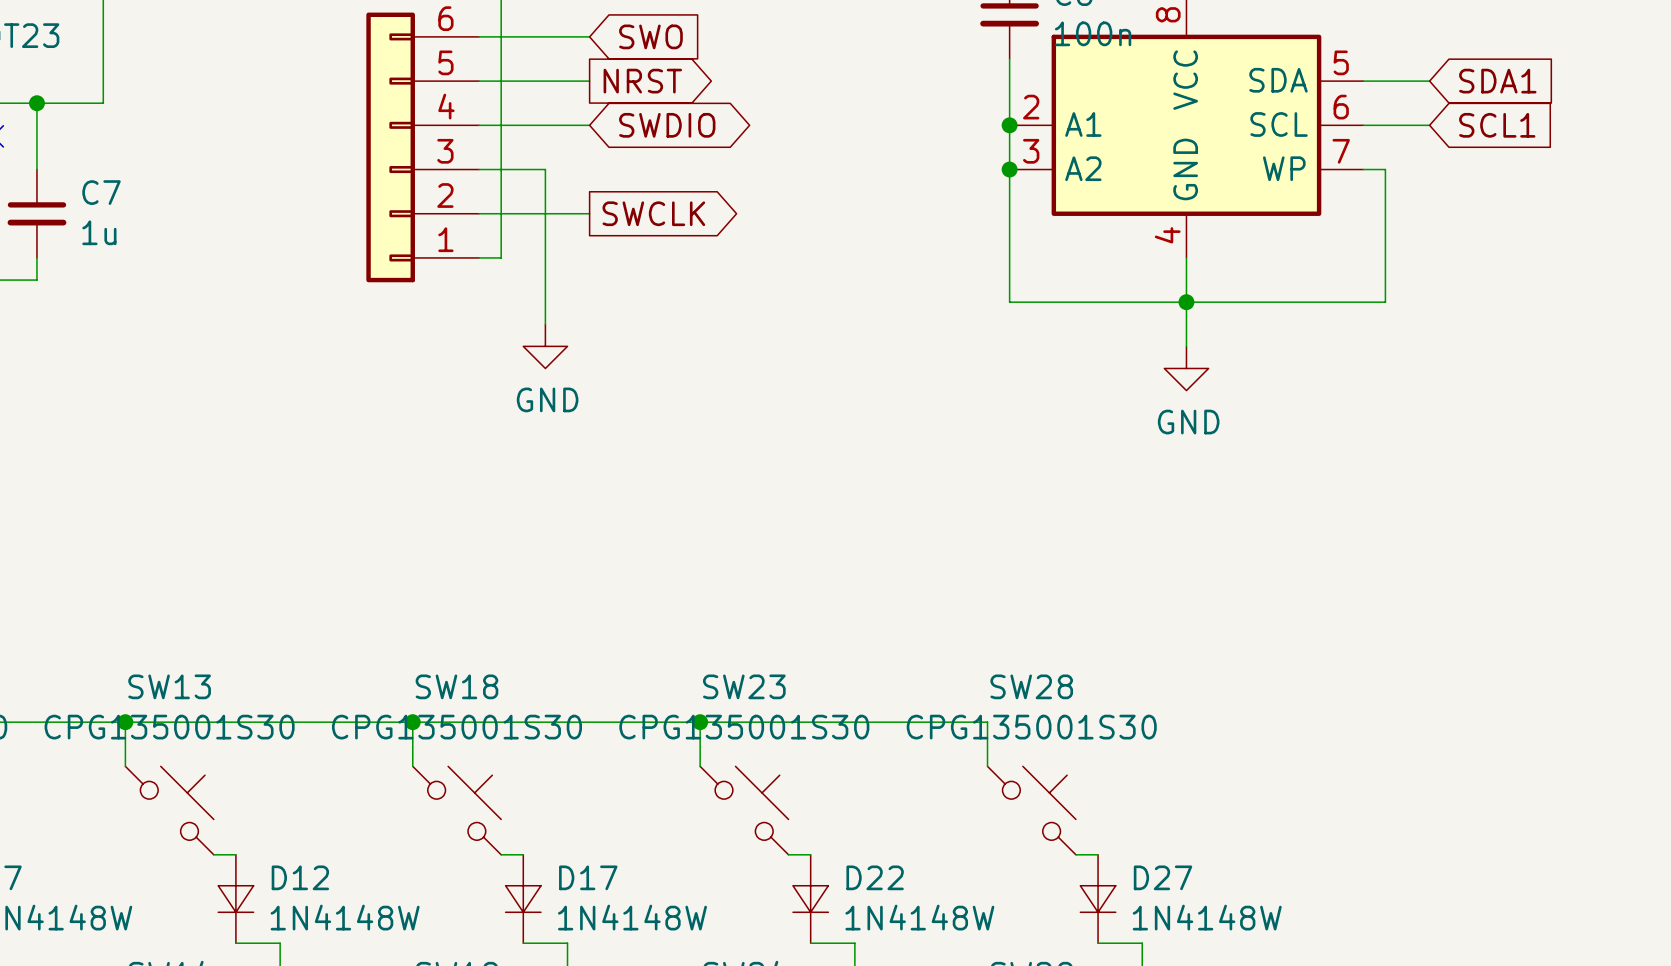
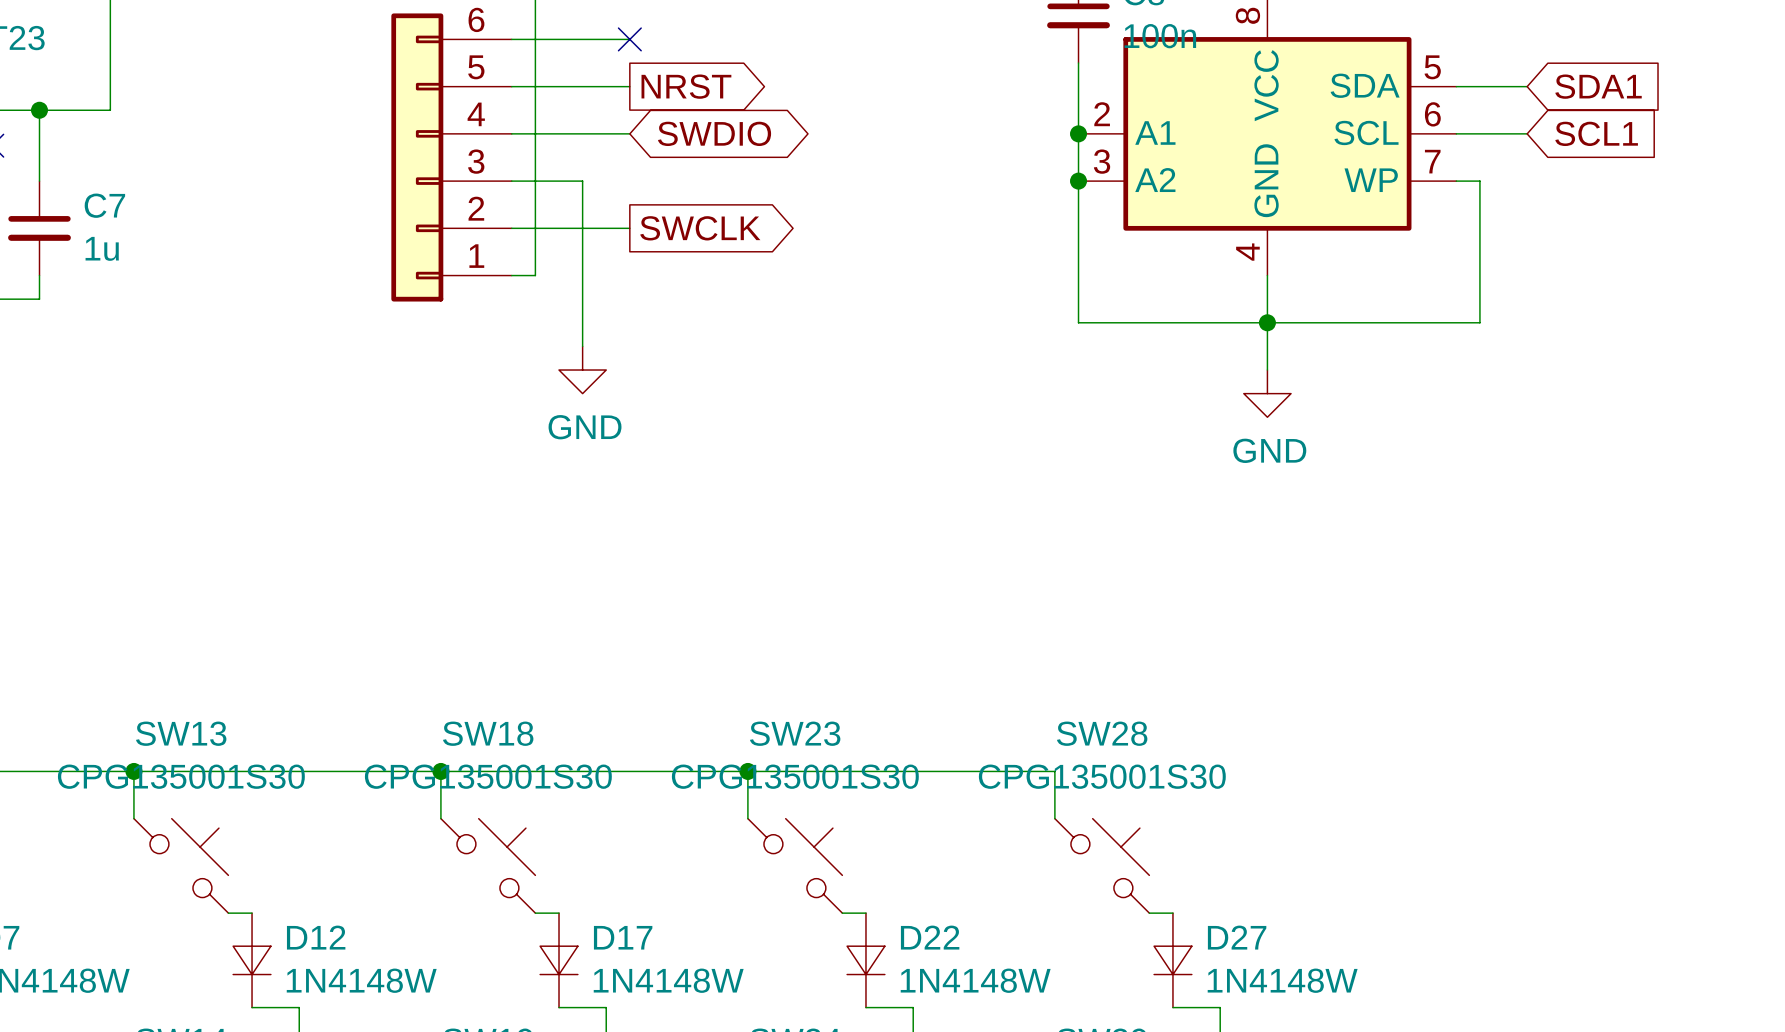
no-connect mark: none -> (629, 39)
global label: SWO (650, 36) -> none

